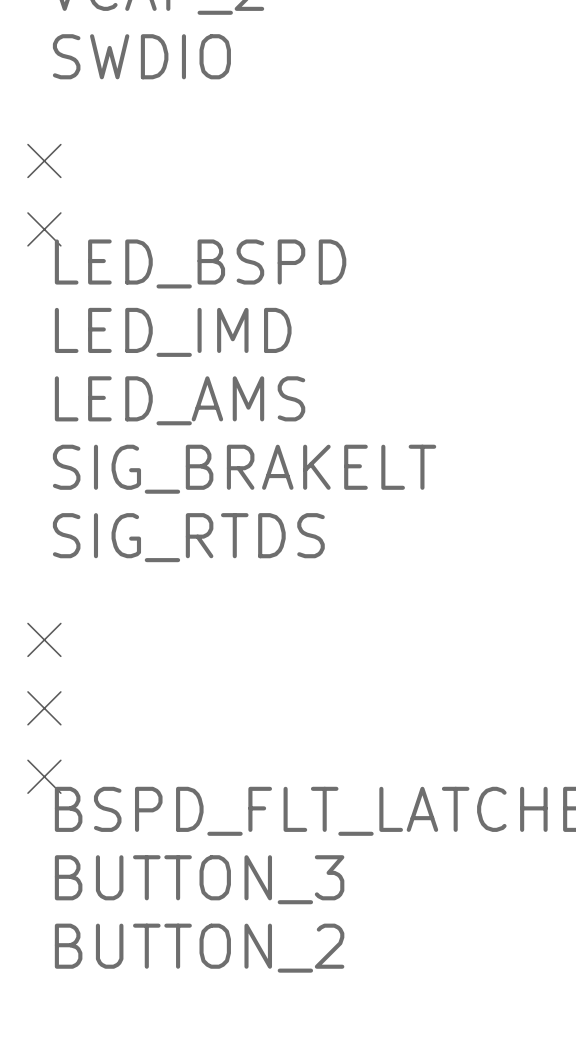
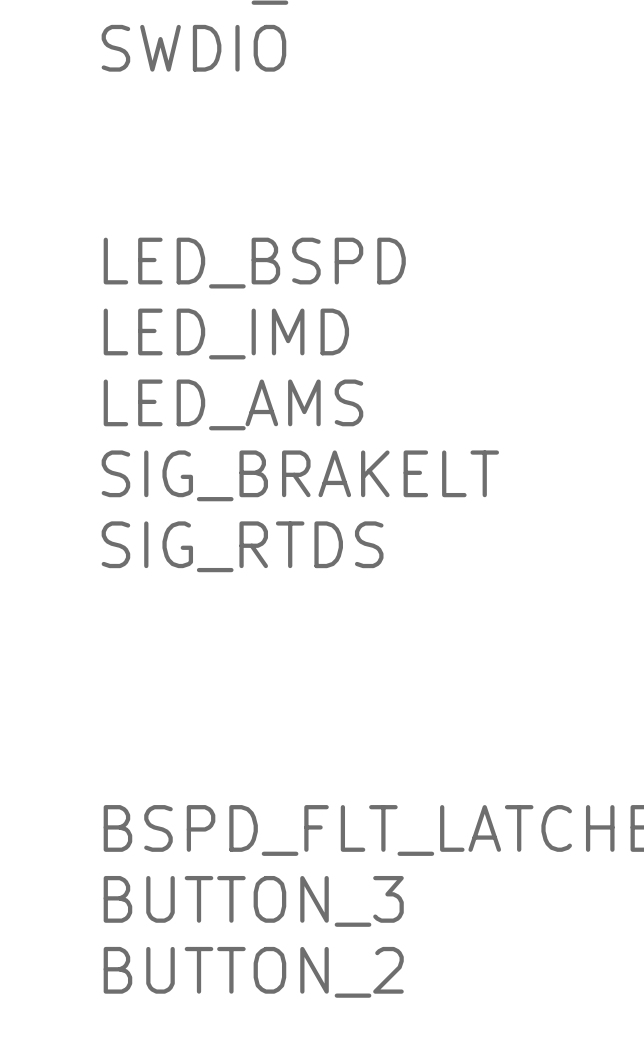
no-connect mark: (44, 160) -> none
no-connect mark: (44, 229) -> none
no-connect mark: (44, 639) -> none
no-connect mark: (44, 708) -> none
no-connect mark: (44, 776) -> none

